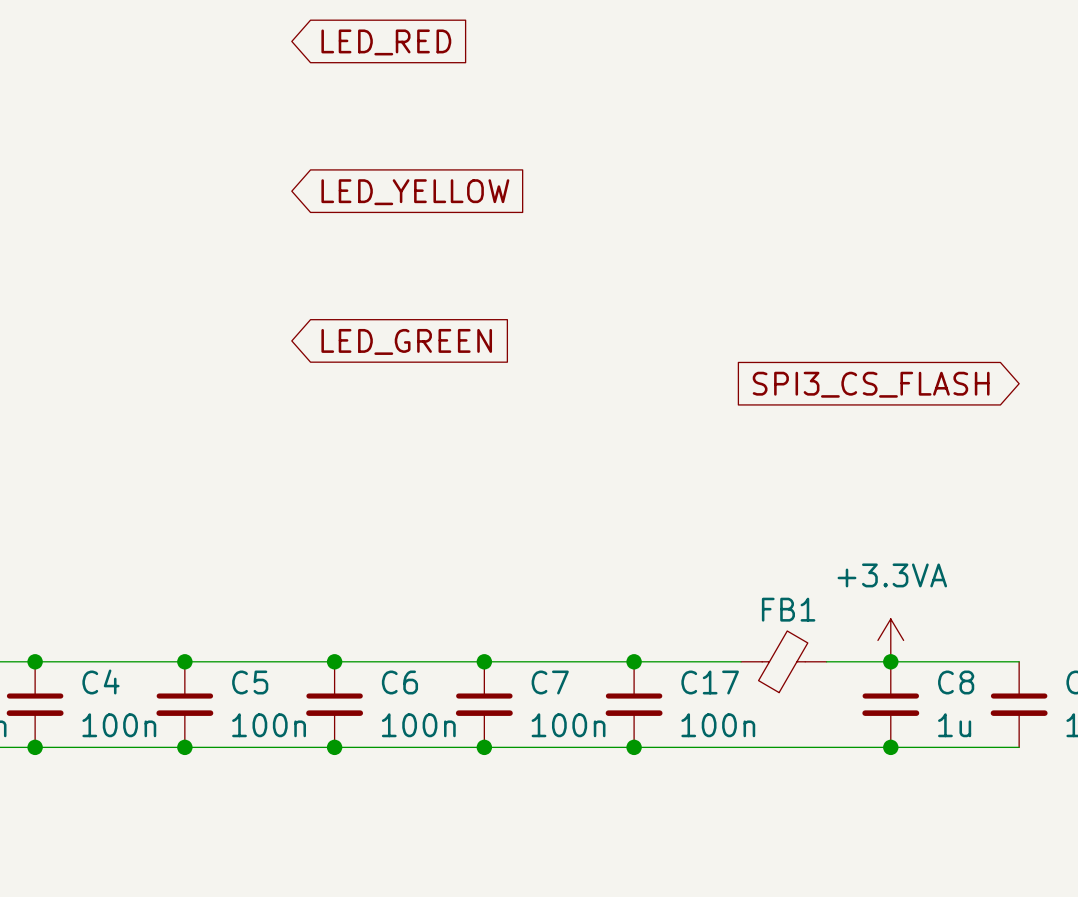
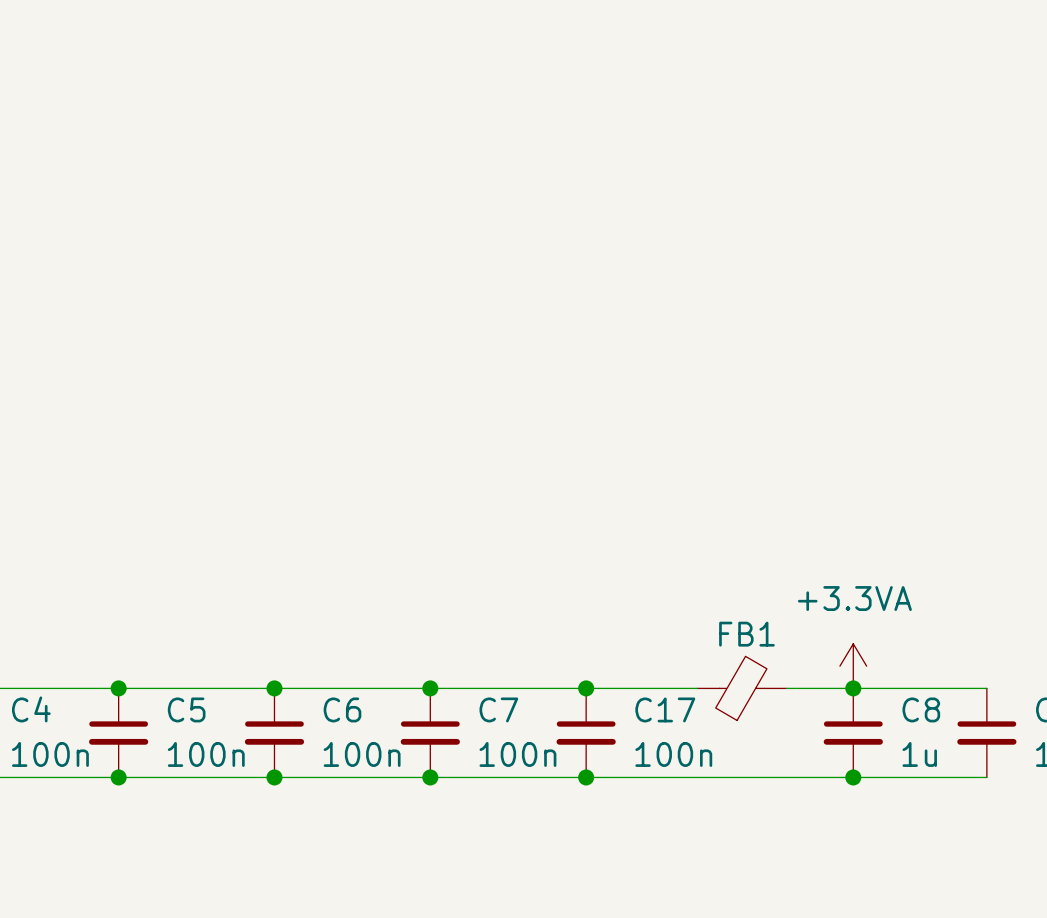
global label: LED_RED (386, 42) -> none
global label: LED_YELLOW (415, 192) -> none
global label: LED_GREEN (406, 341) -> none
global label: SPI3_CS_FLASH (871, 384) -> none

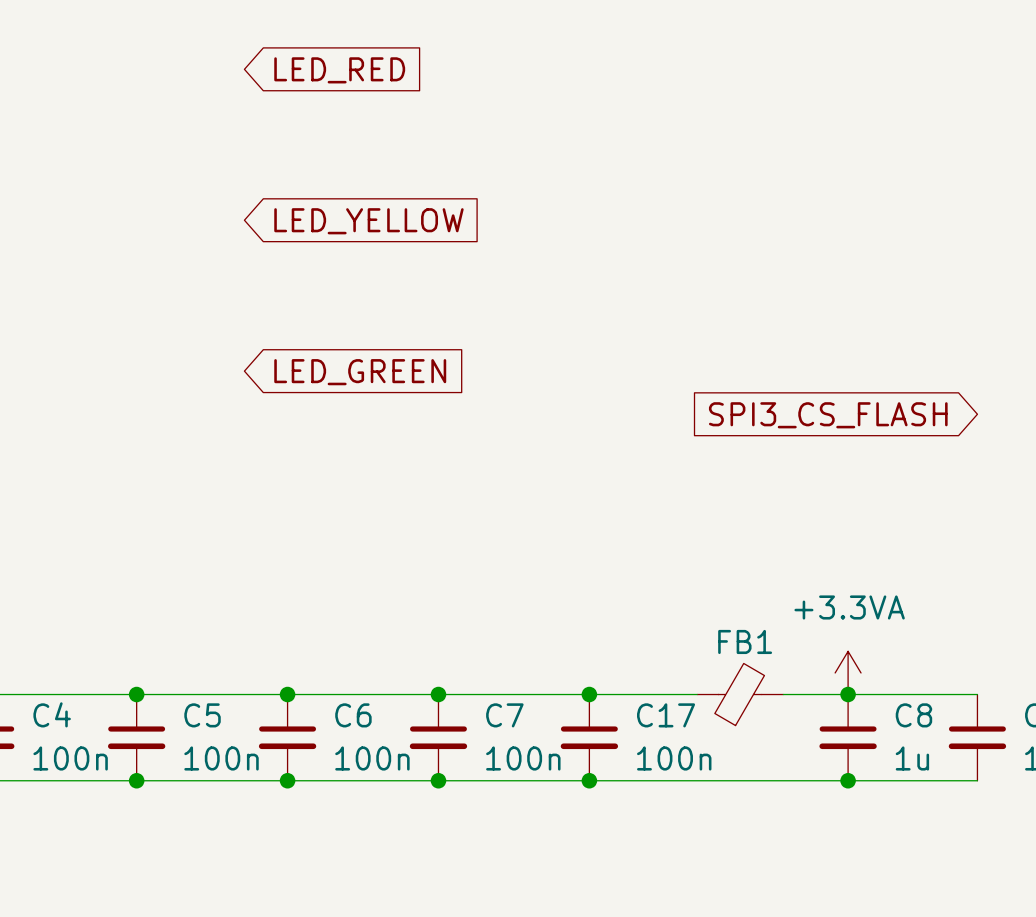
global label: none -> LED_RED (339, 70)
global label: none -> LED_YELLOW (368, 221)
global label: none -> LED_GREEN (360, 372)
global label: none -> SPI3_CS_FLASH (828, 415)

